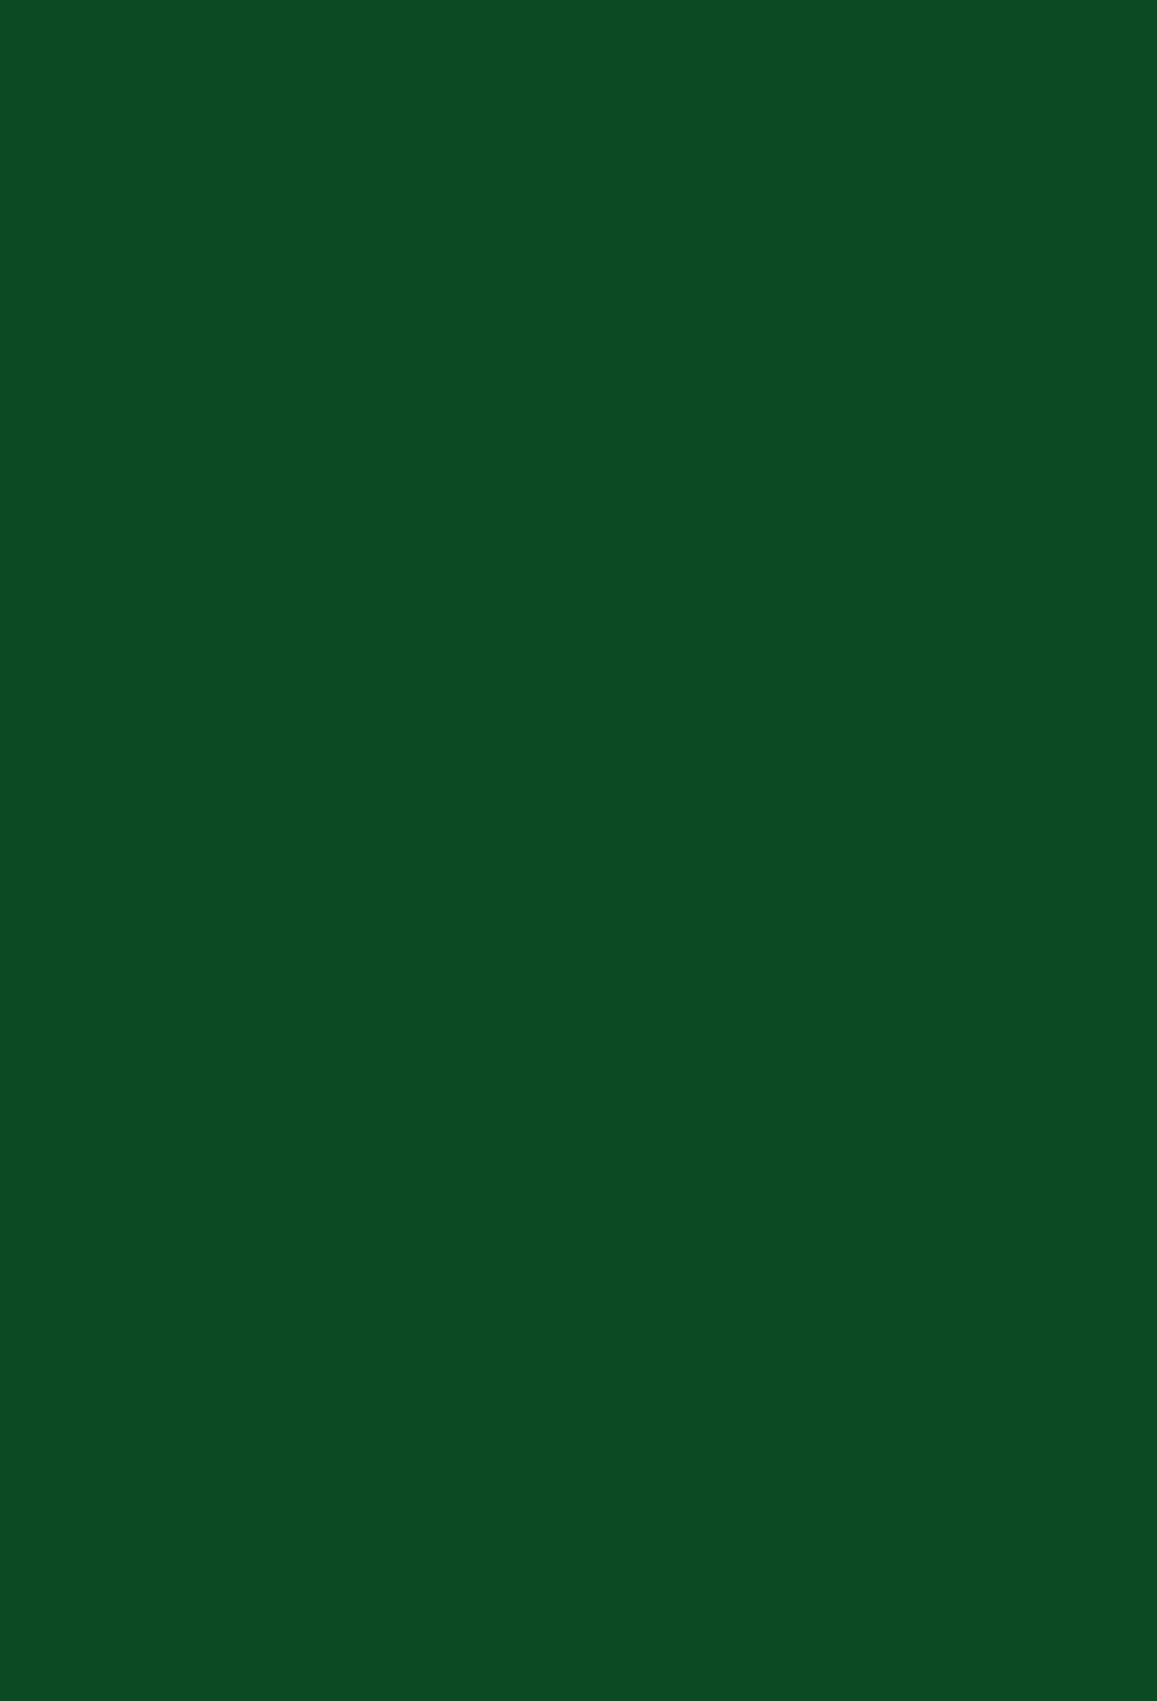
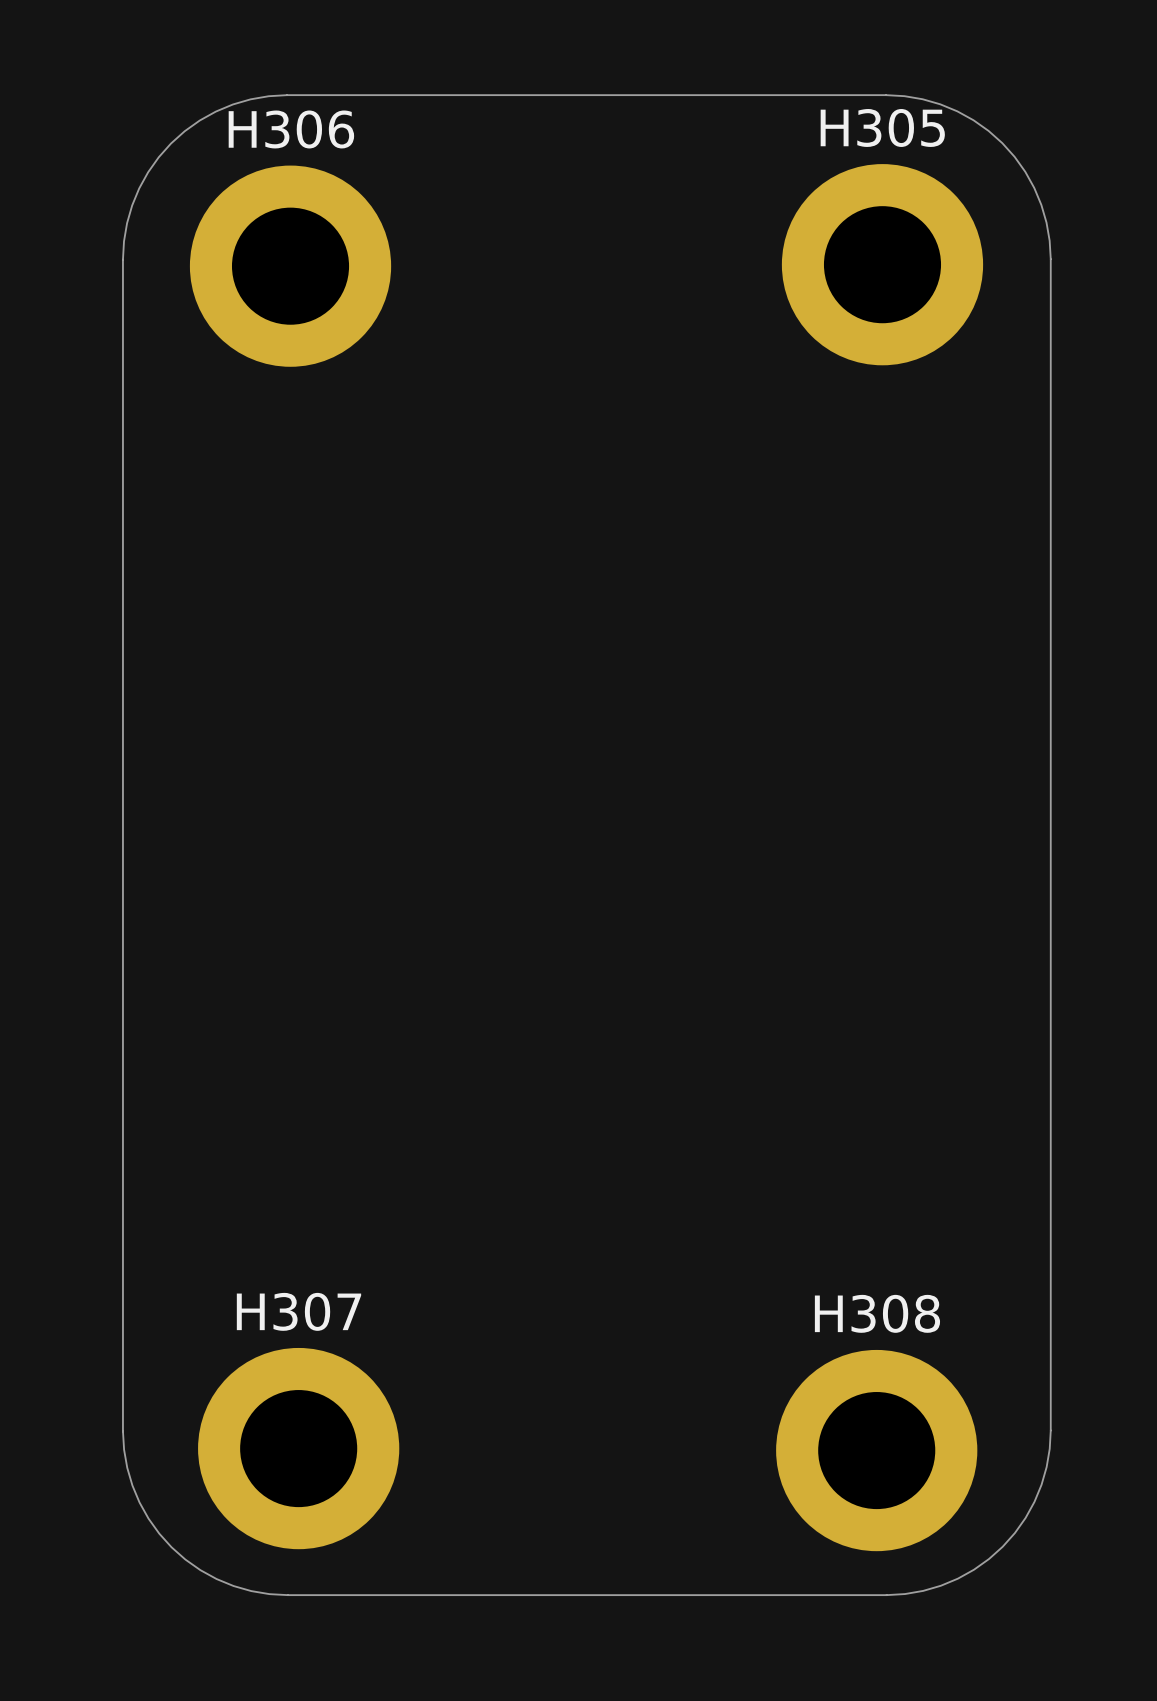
board edge: none -> (287, 95) (904, 96) (940, 104) (957, 111) (988, 130) (1014, 156) (1034, 187) (1046, 222) (1050, 259) (1050, 1430) (1046, 1467) (1041, 1484) (1025, 1517) (1014, 1532) (989, 1559) (957, 1578) (923, 1590) (886, 1595) (269, 1594) (233, 1586) (200, 1570) (171, 1547) (148, 1518) (139, 1502) (127, 1467) (122, 1431) (124, 241) (127, 223) (139, 188) (148, 172) (171, 143) (199, 120) (215, 111) (250, 99) (287, 95)
H305: none -> (882, 264)
H306: none -> (290, 266)
H307: none -> (298, 1448)
H308: none -> (876, 1450)

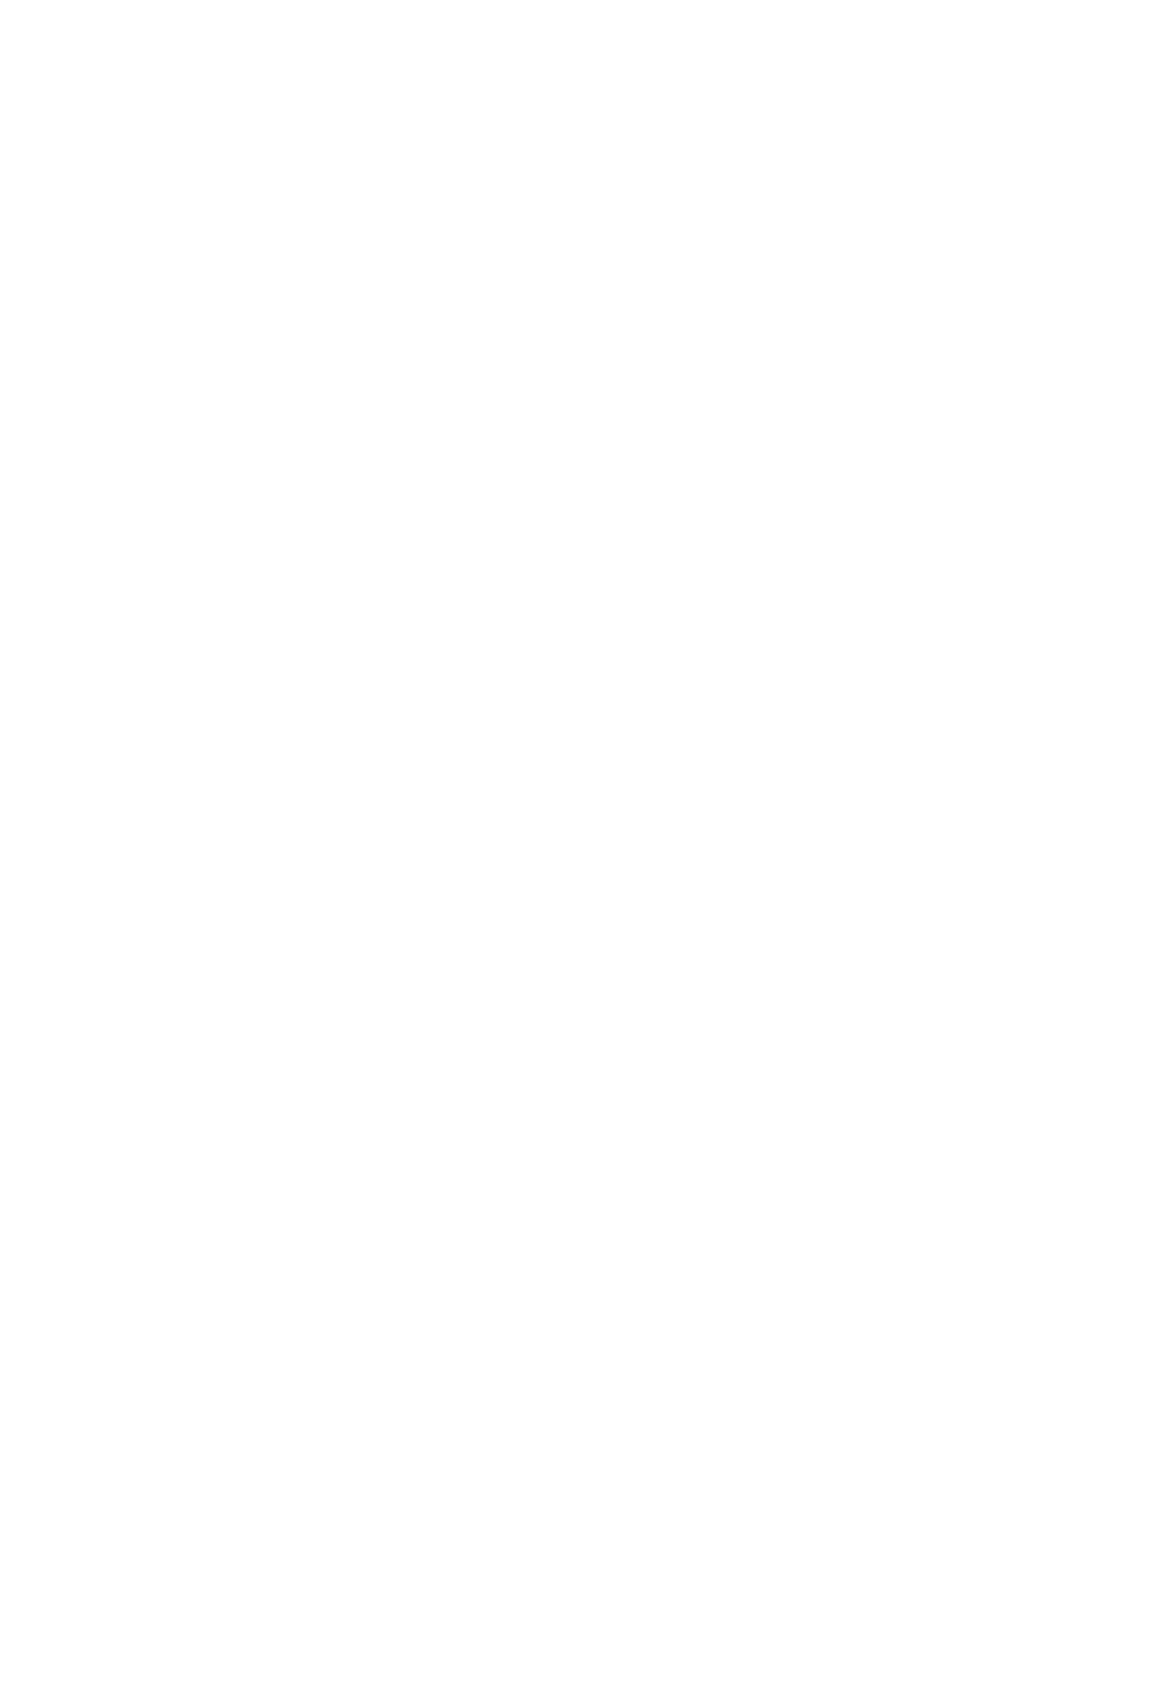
board edge: (287, 95) (904, 96) (940, 104) (957, 111) (988, 130) (1014, 156) (1034, 187) (1046, 222) (1050, 259) (1050, 1430) (1046, 1467) (1041, 1484) (1025, 1517) (1014, 1532) (989, 1559) (957, 1578) (923, 1590) (886, 1595) (269, 1594) (233, 1586) (200, 1570) (171, 1547) (148, 1518) (139, 1502) (127, 1467) (122, 1431) (124, 241) (127, 223) (139, 188) (148, 172) (171, 143) (199, 120) (215, 111) (250, 99) (287, 95) -> none
H305: (882, 264) -> none
H306: (290, 266) -> none
H307: (298, 1448) -> none
H308: (876, 1450) -> none

